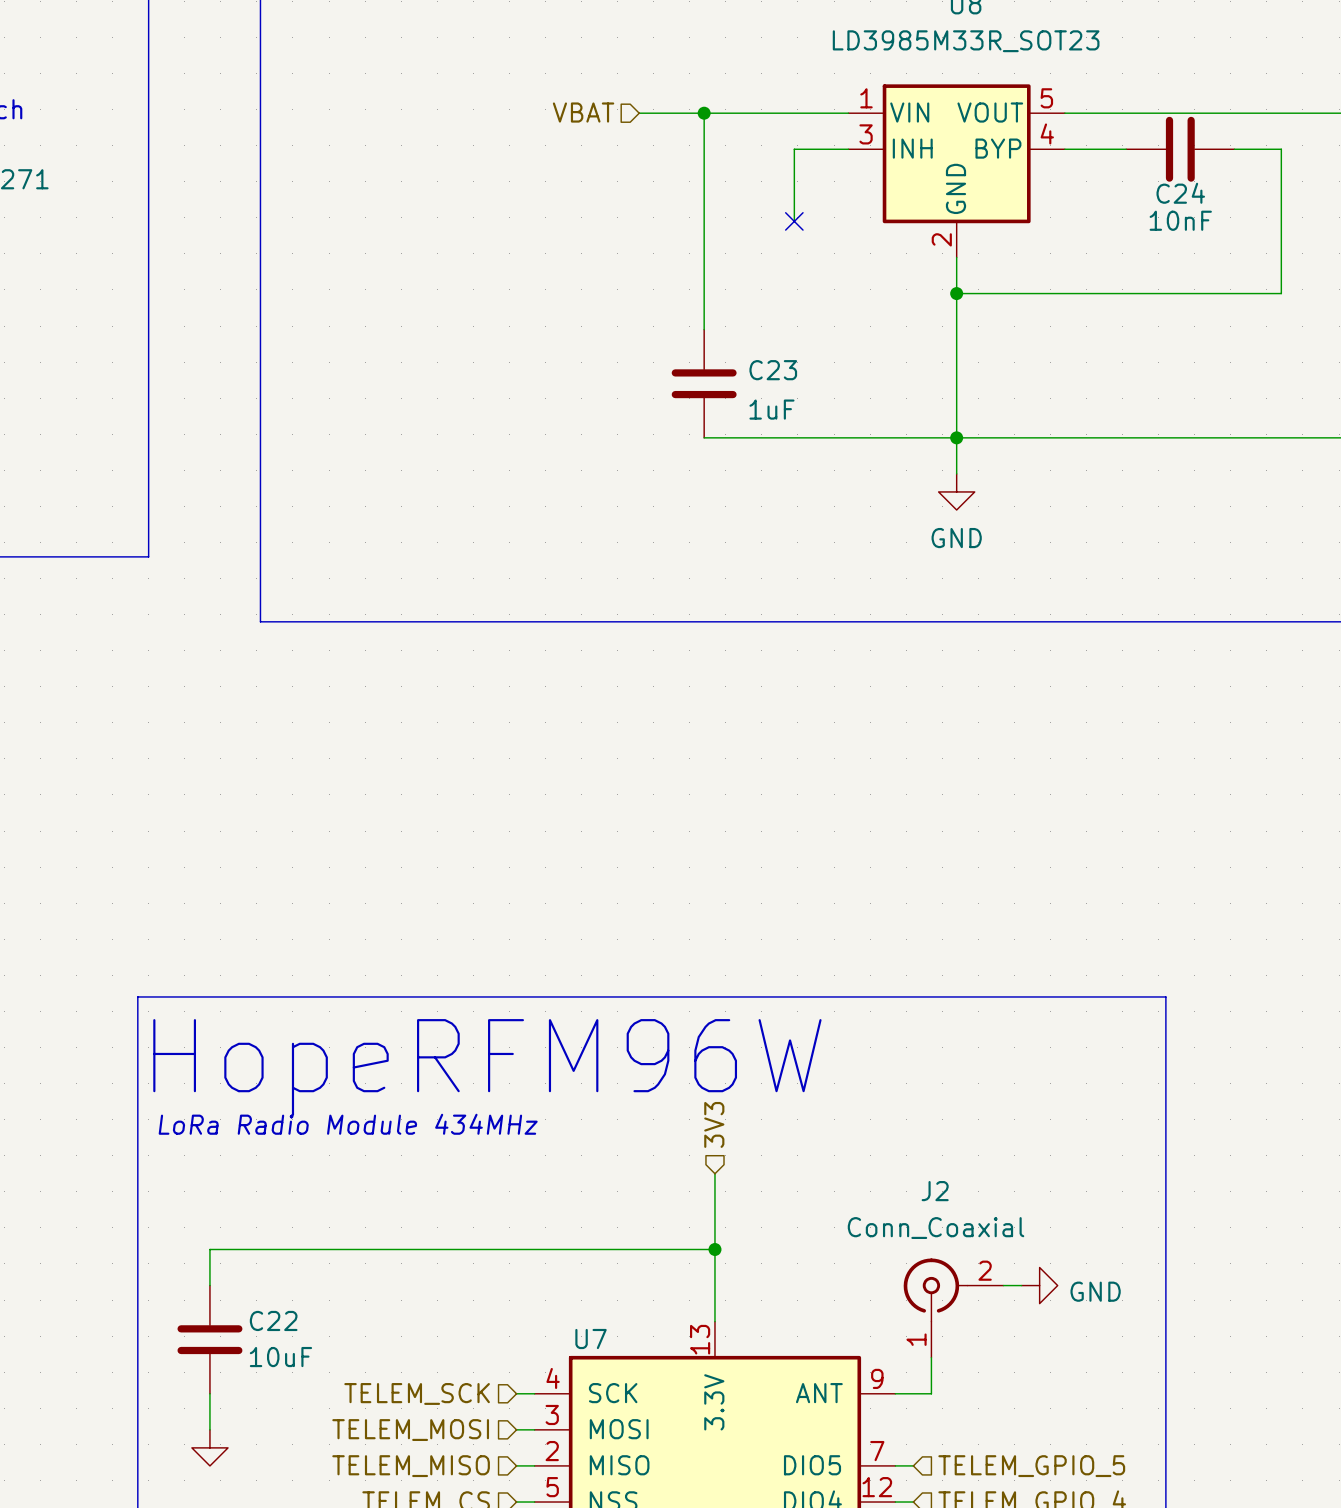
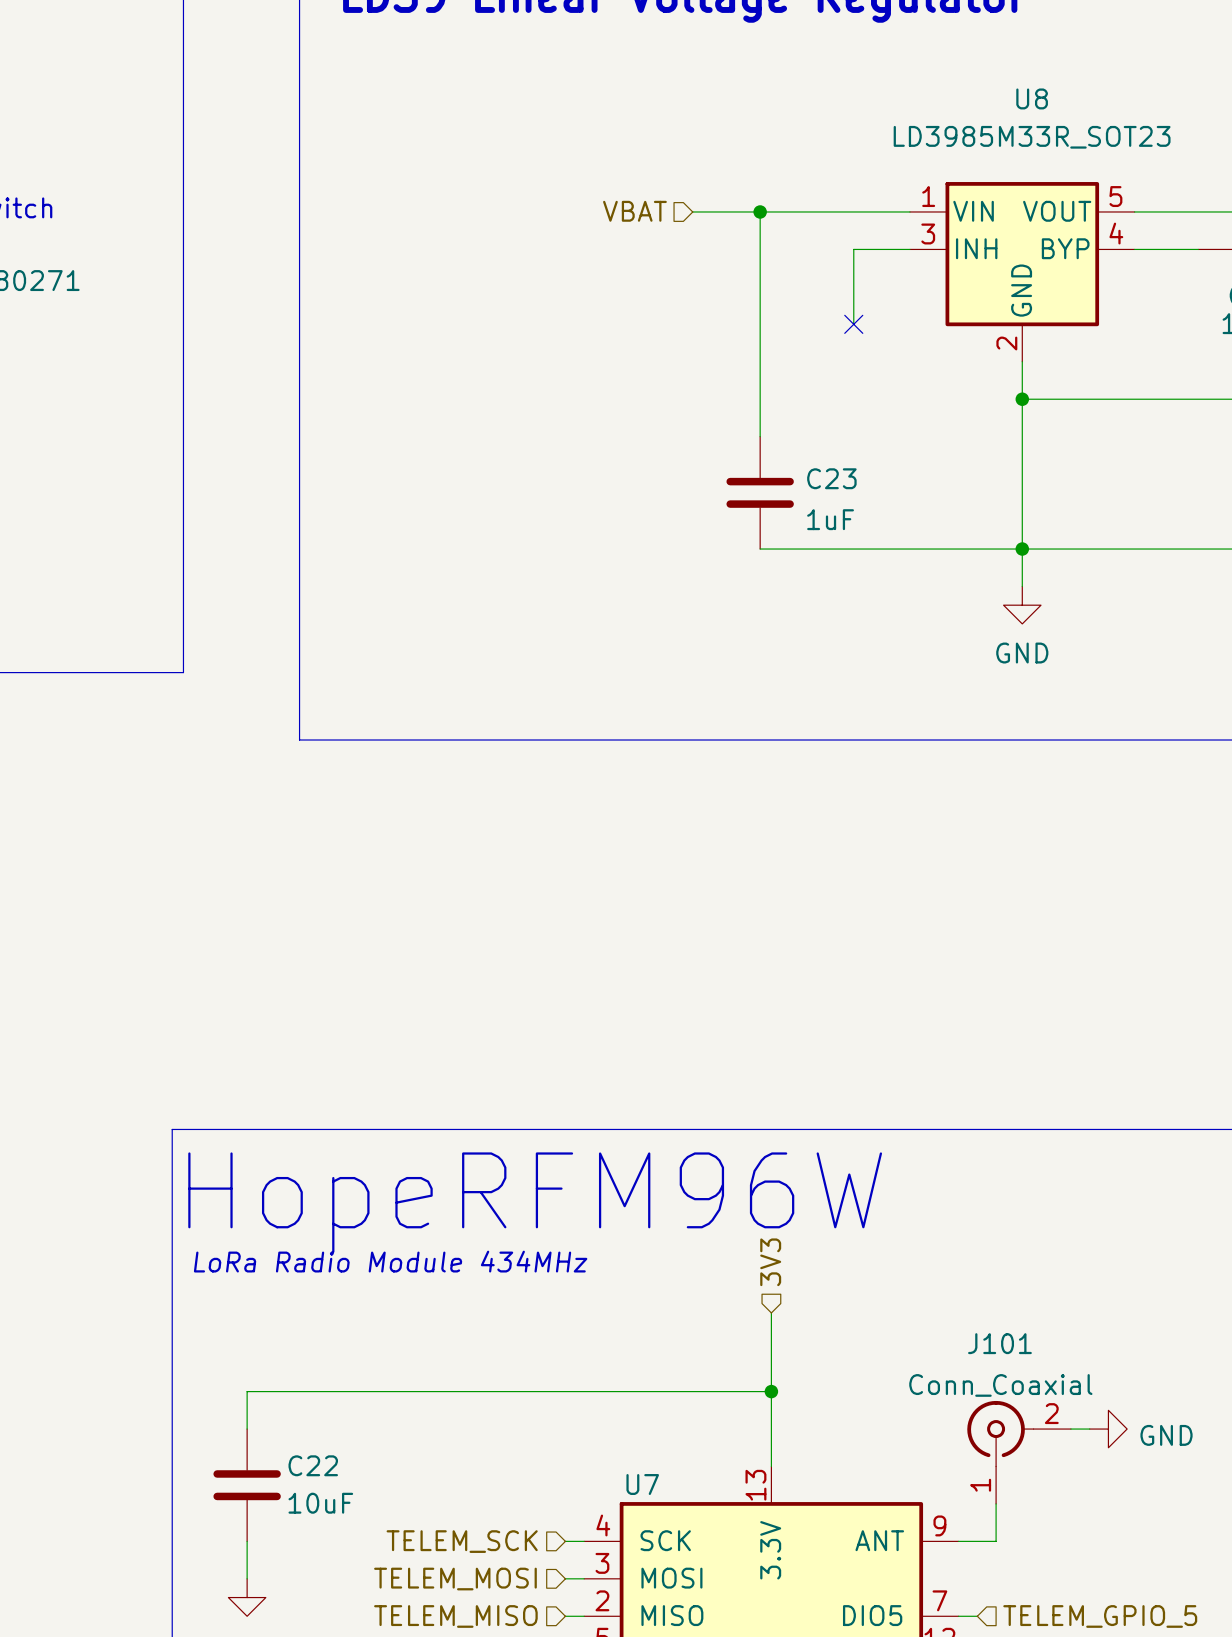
J2 name: J2 (935, 1191) -> J101 (999, 1343)
J2 value position: Conn_Coaxial (936, 1228) -> Conn_Coaxial (1000, 1385)

